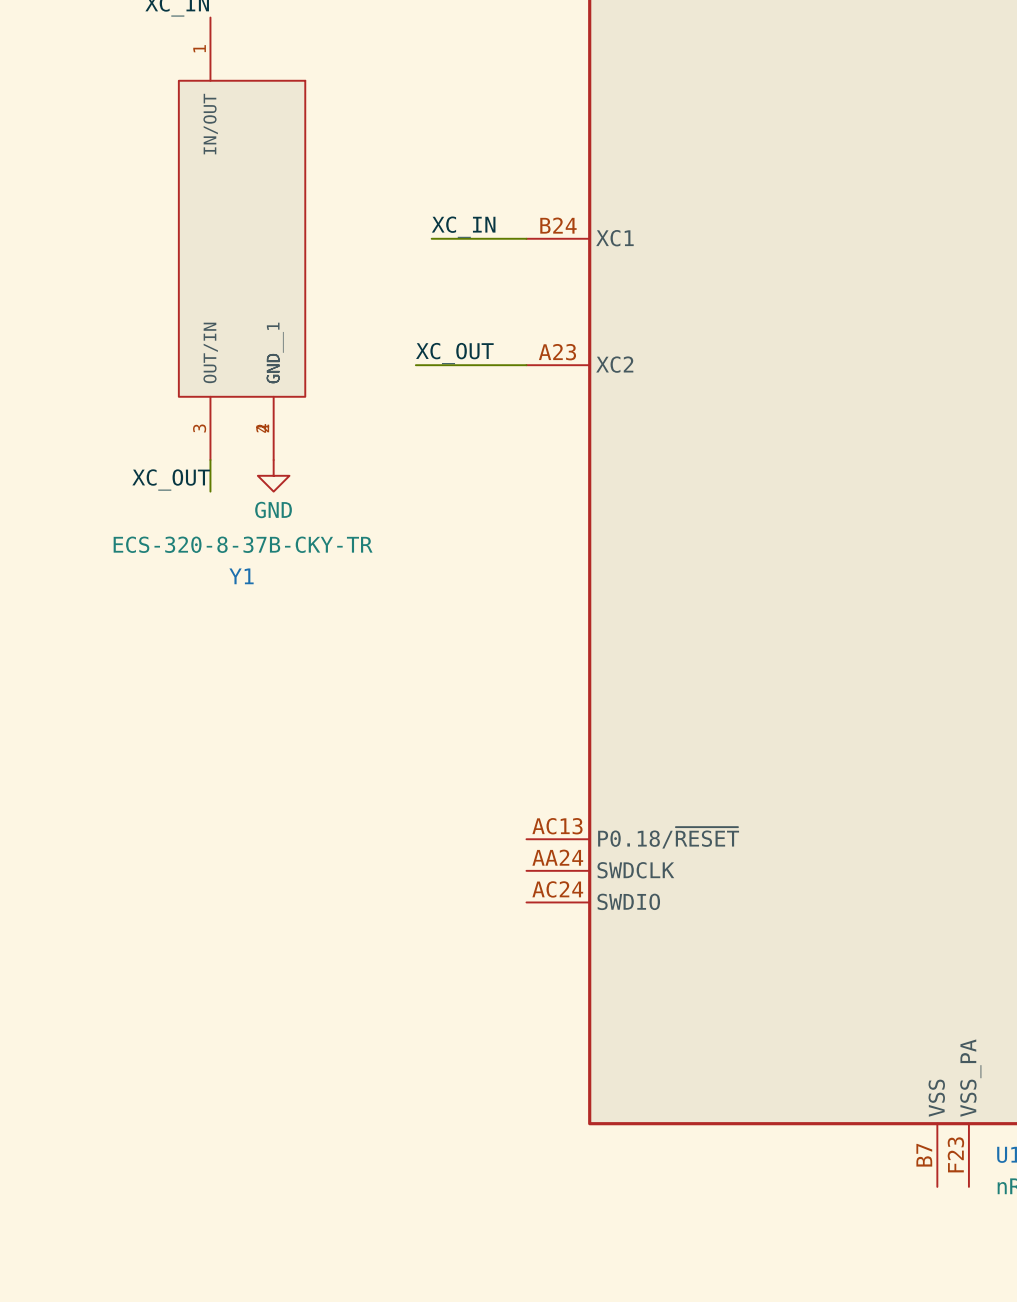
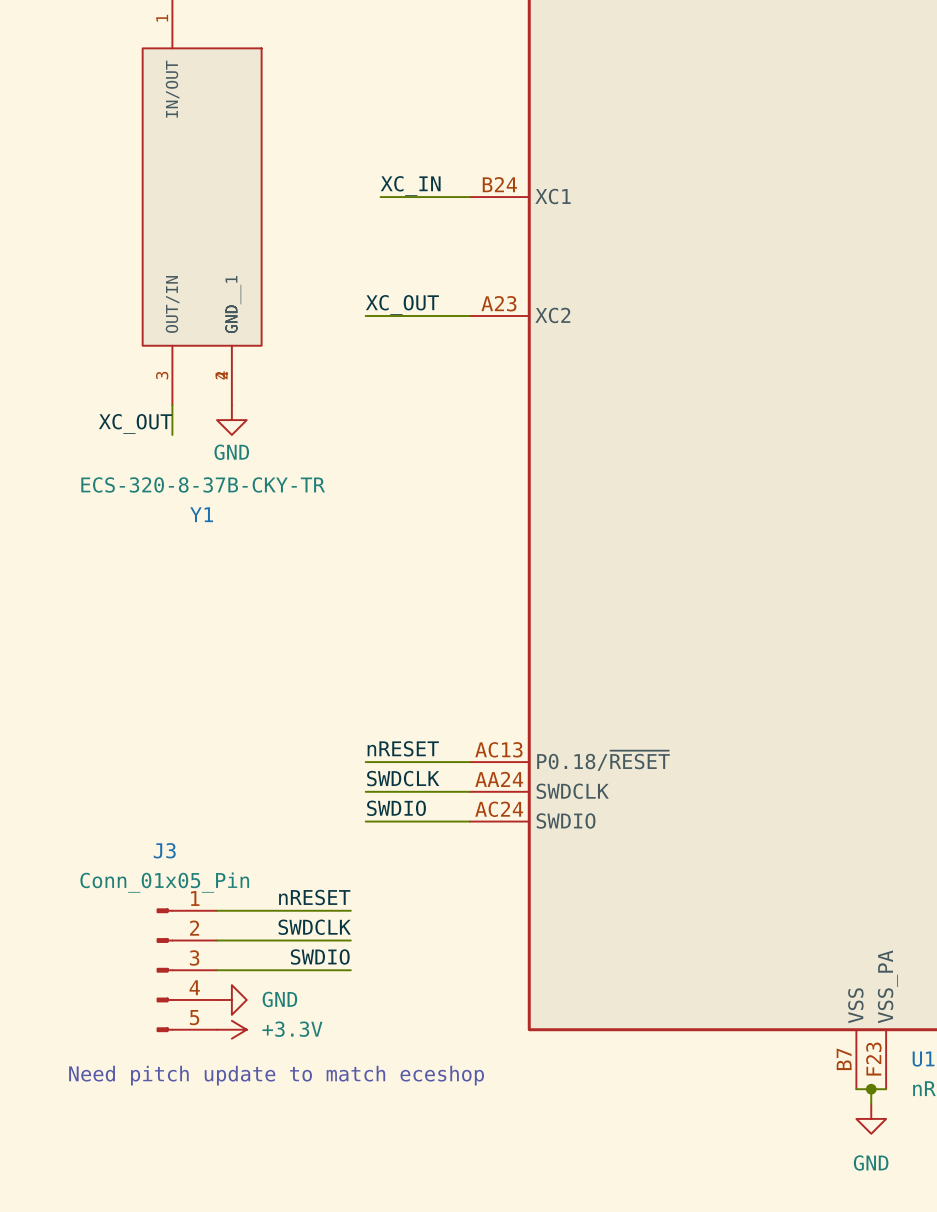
label: none -> nRESET (403, 748)
wire: none -> (365, 762) (469, 762)
label: none -> SWDCLK (403, 778)
wire: none -> (365, 791) (469, 791)
label: none -> SWDIO (396, 808)
wire: none -> (365, 821) (469, 821)
label: none -> nRESET (314, 897)
wire: none -> (217, 910) (350, 910)
label: none -> SWDCLK (314, 927)
wire: none -> (217, 940) (350, 940)
label: none -> SWDIO (320, 956)
J3: none -> Conn_01x05_Pin (186, 970)
wire: none -> (217, 970) (350, 970)
power symbol: none -> GND (231, 999)
power symbol: none -> +3.3V (231, 1029)
text: none -> Need pitch update to match eceshop (276, 1075)
wire: none -> (856, 1089) (886, 1089)
wire: none -> (871, 1089) (871, 1104)
junction: none -> (871, 1089)
power symbol: none -> GND (871, 1118)

